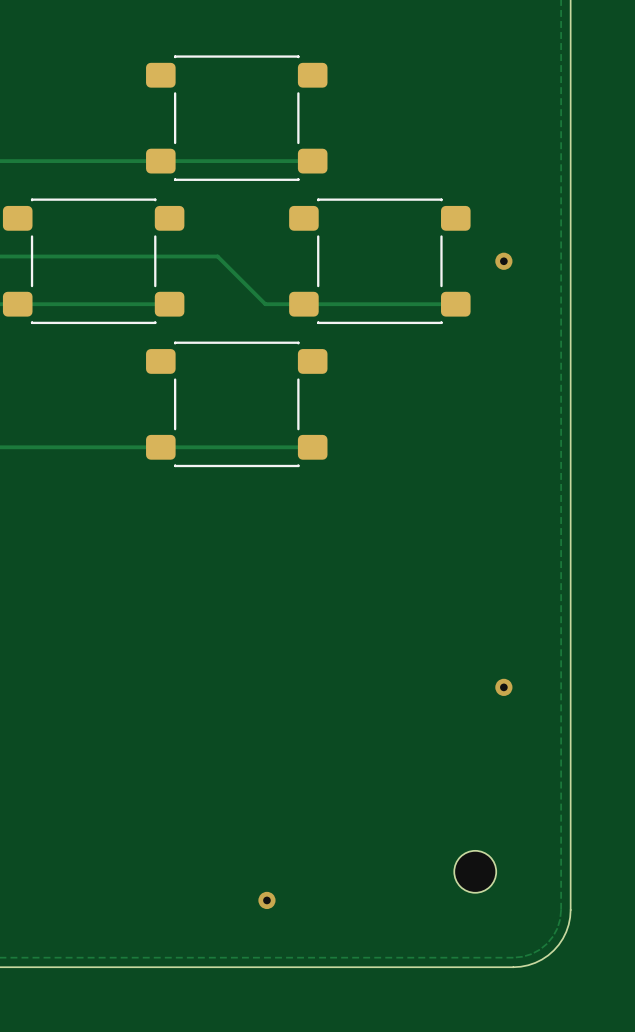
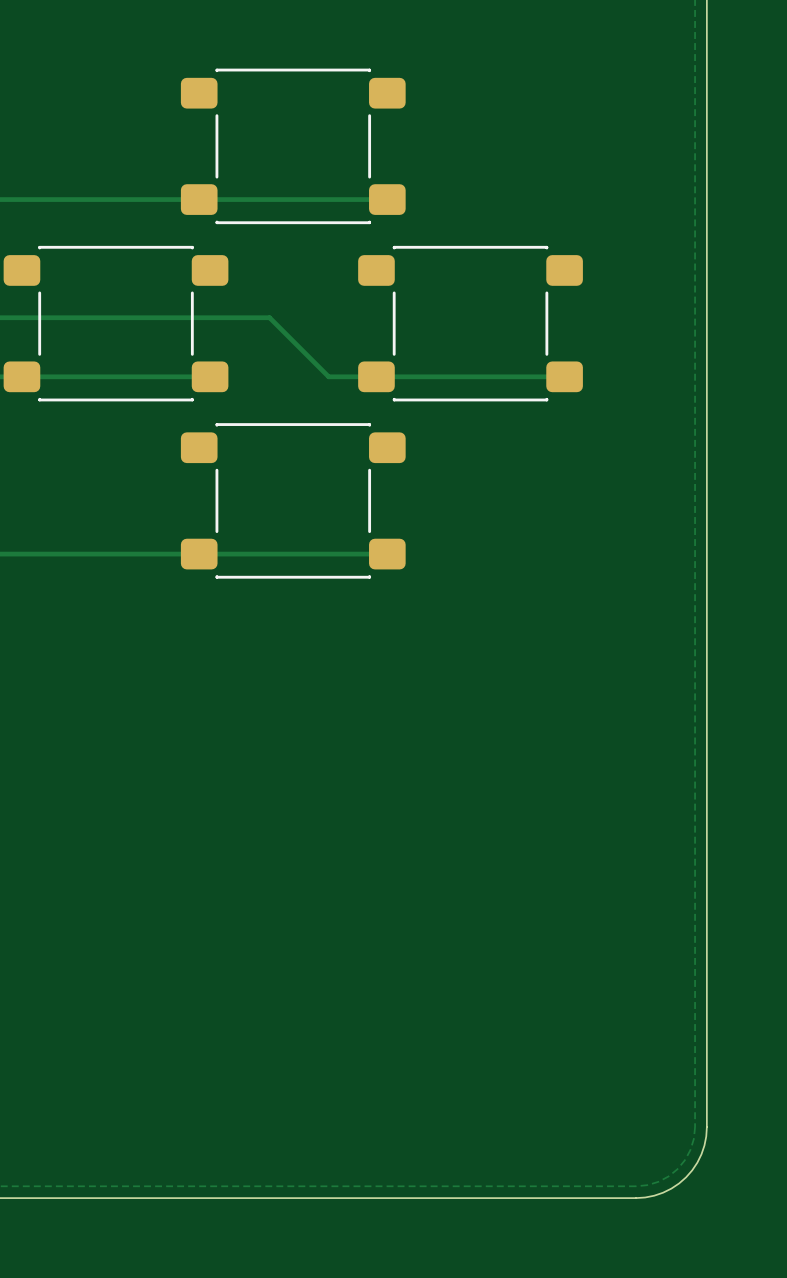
via: (503, 261) -> none
via: (503, 687) -> none
part: (475, 871) -> none
via: (266, 900) -> none

